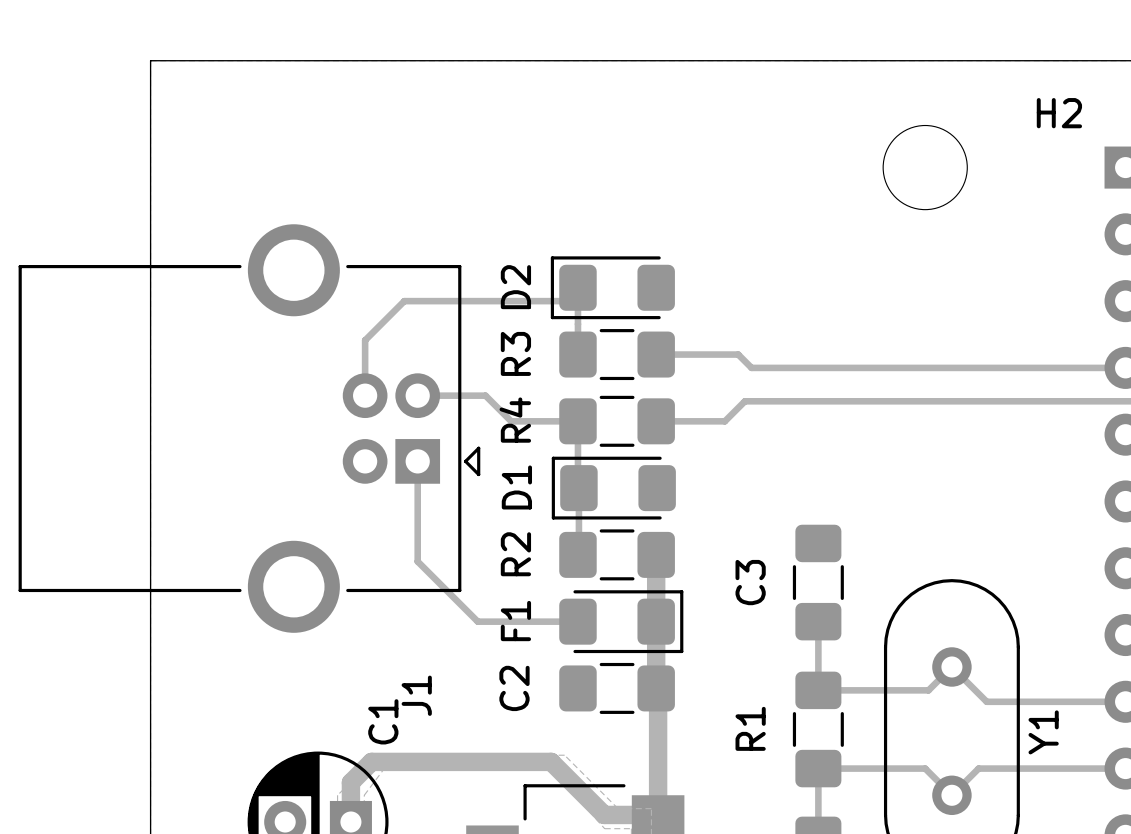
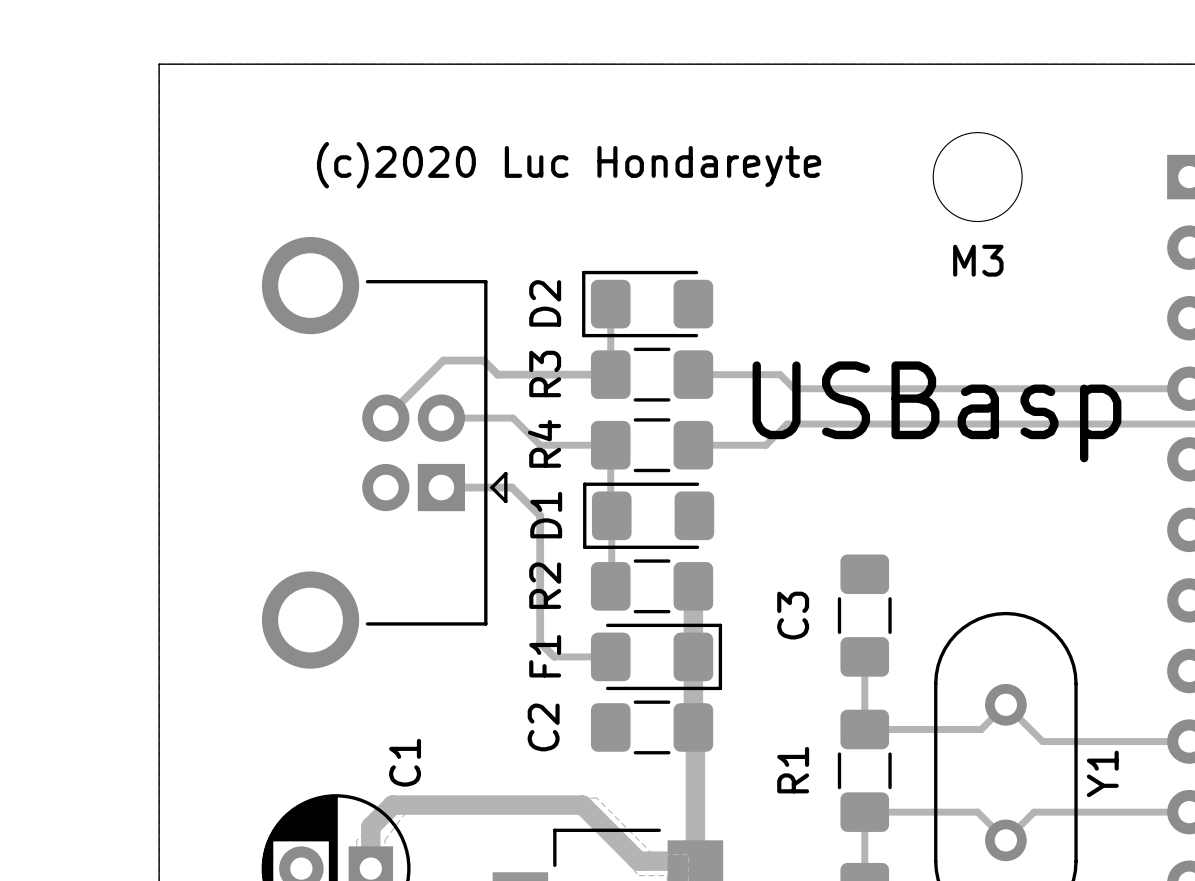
H2 name: H2 (1059, 113) -> none
text: none -> (c)2020 Luc Hondareyte (569, 165)
H2 value: none -> M3 (978, 260)
track: (577, 301) (404, 301) (365, 340) (365, 395) -> (610, 374) (497, 374) (483, 360) (443, 360) (385, 418)
text: none -> USBasp (936, 411)
J1: (249, 428) -> none
part: none -> (384, 452)
track: (417, 461) (417, 561) (477, 621) (524, 621) -> (441, 487) (511, 487) (540, 515) (540, 642) (554, 656)

